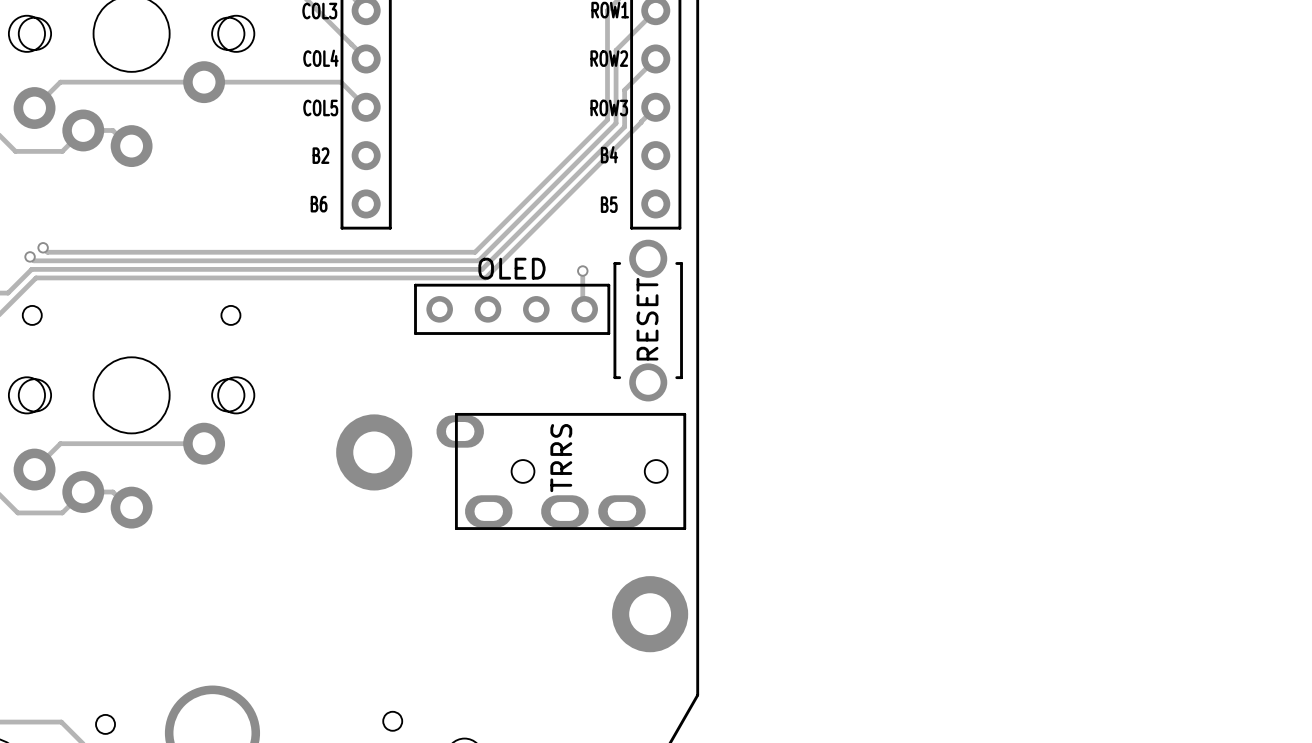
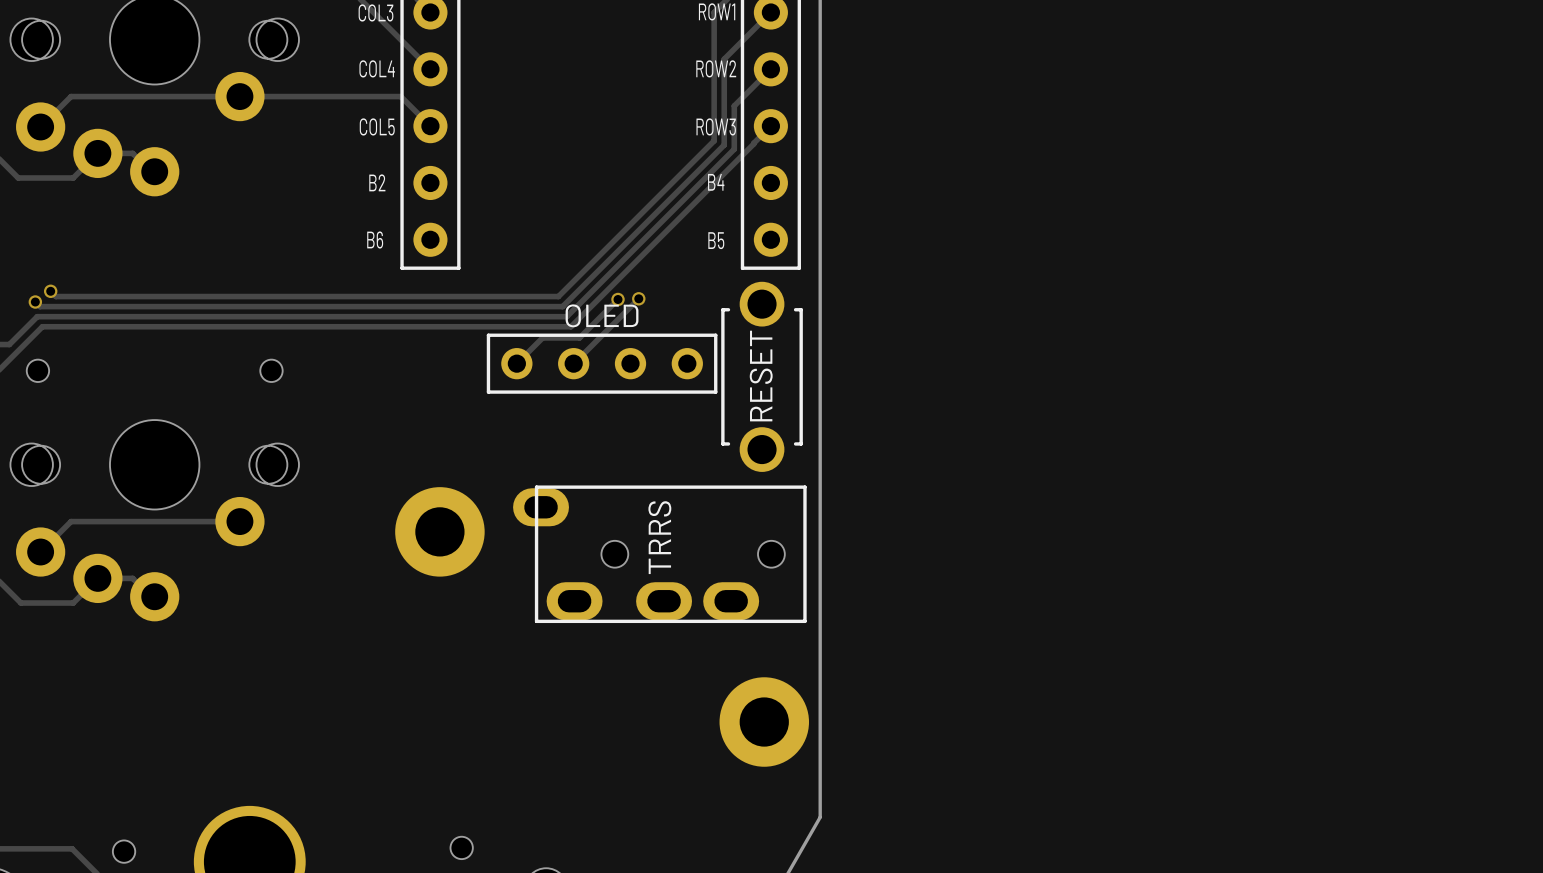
track: none -> (618, 299) (579, 337) (542, 337) (516, 363)
via: none -> (618, 299)
track: none -> (638, 298) (573, 363)
via: none -> (638, 298)
track: (582, 271) (582, 307) -> none
via: (582, 271) -> none

